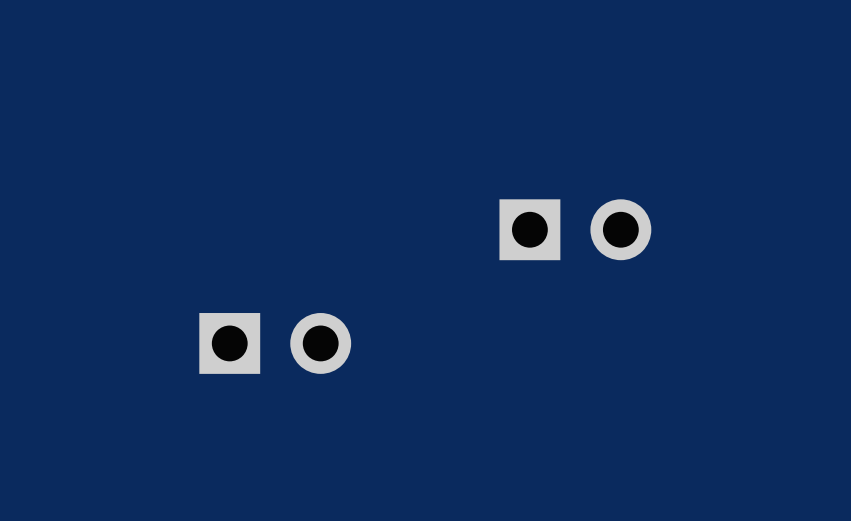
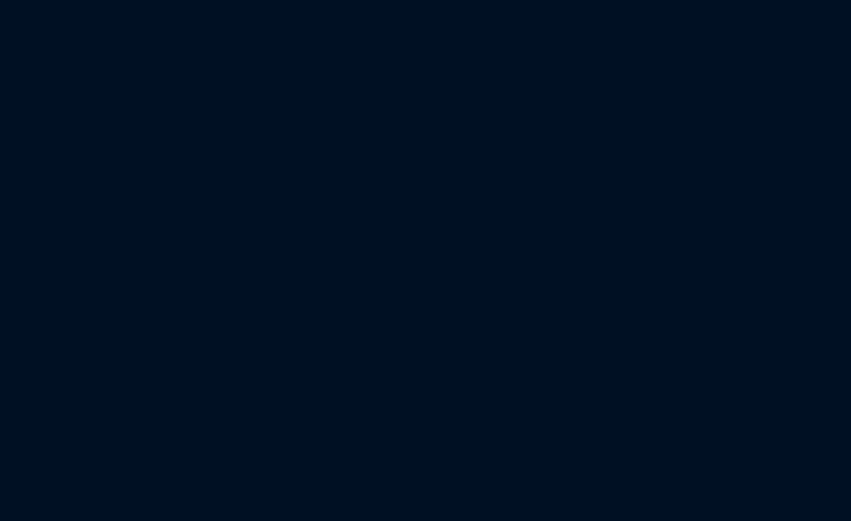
part: (575, 229) -> none
part: (275, 343) -> none

